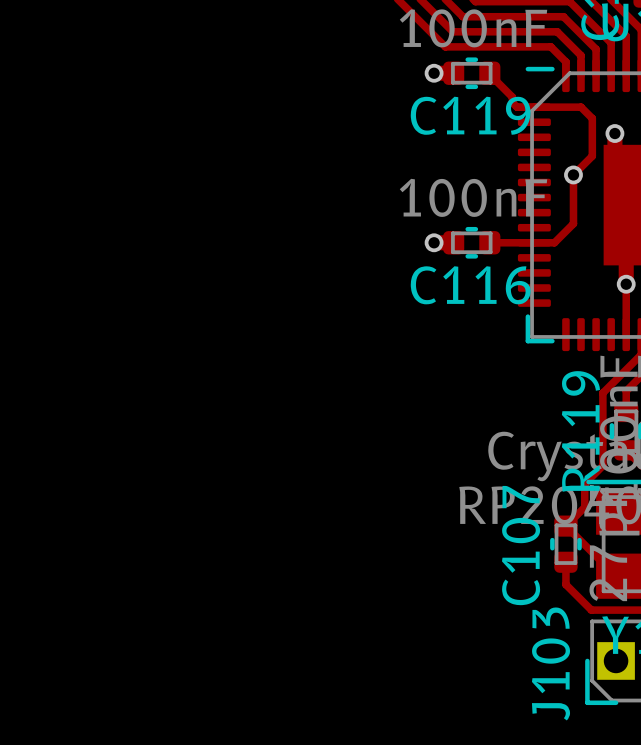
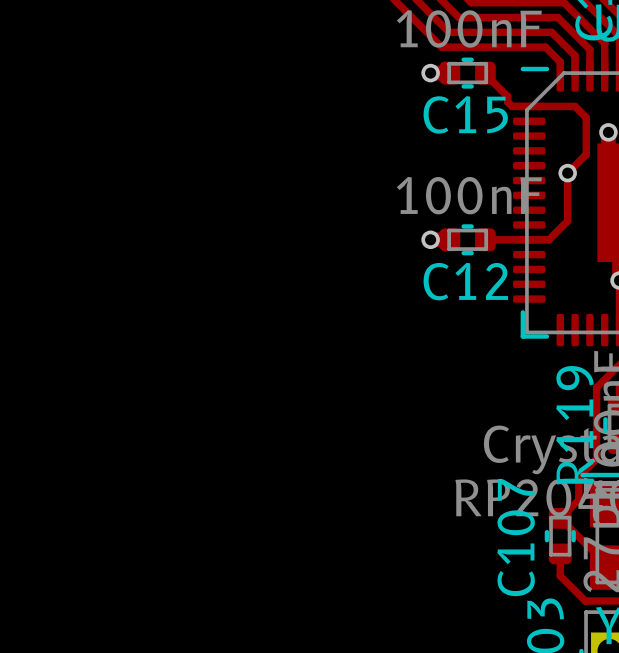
C119 name: C119 (470, 115) -> C15 (465, 114)
C116 name: C116 (470, 285) -> C12 (465, 281)

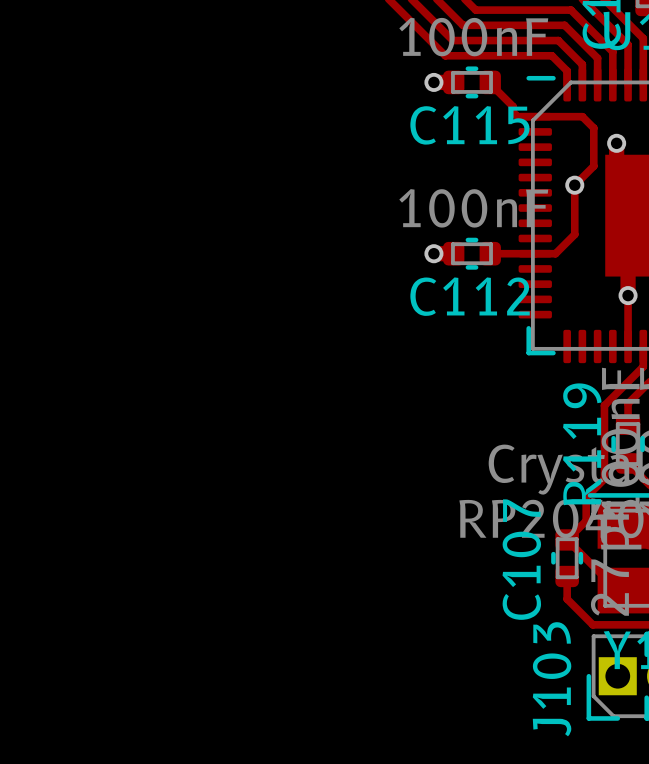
C15 name: C15 (465, 114) -> C115 (469, 125)
C12 name: C12 (465, 281) -> C112 (470, 296)

